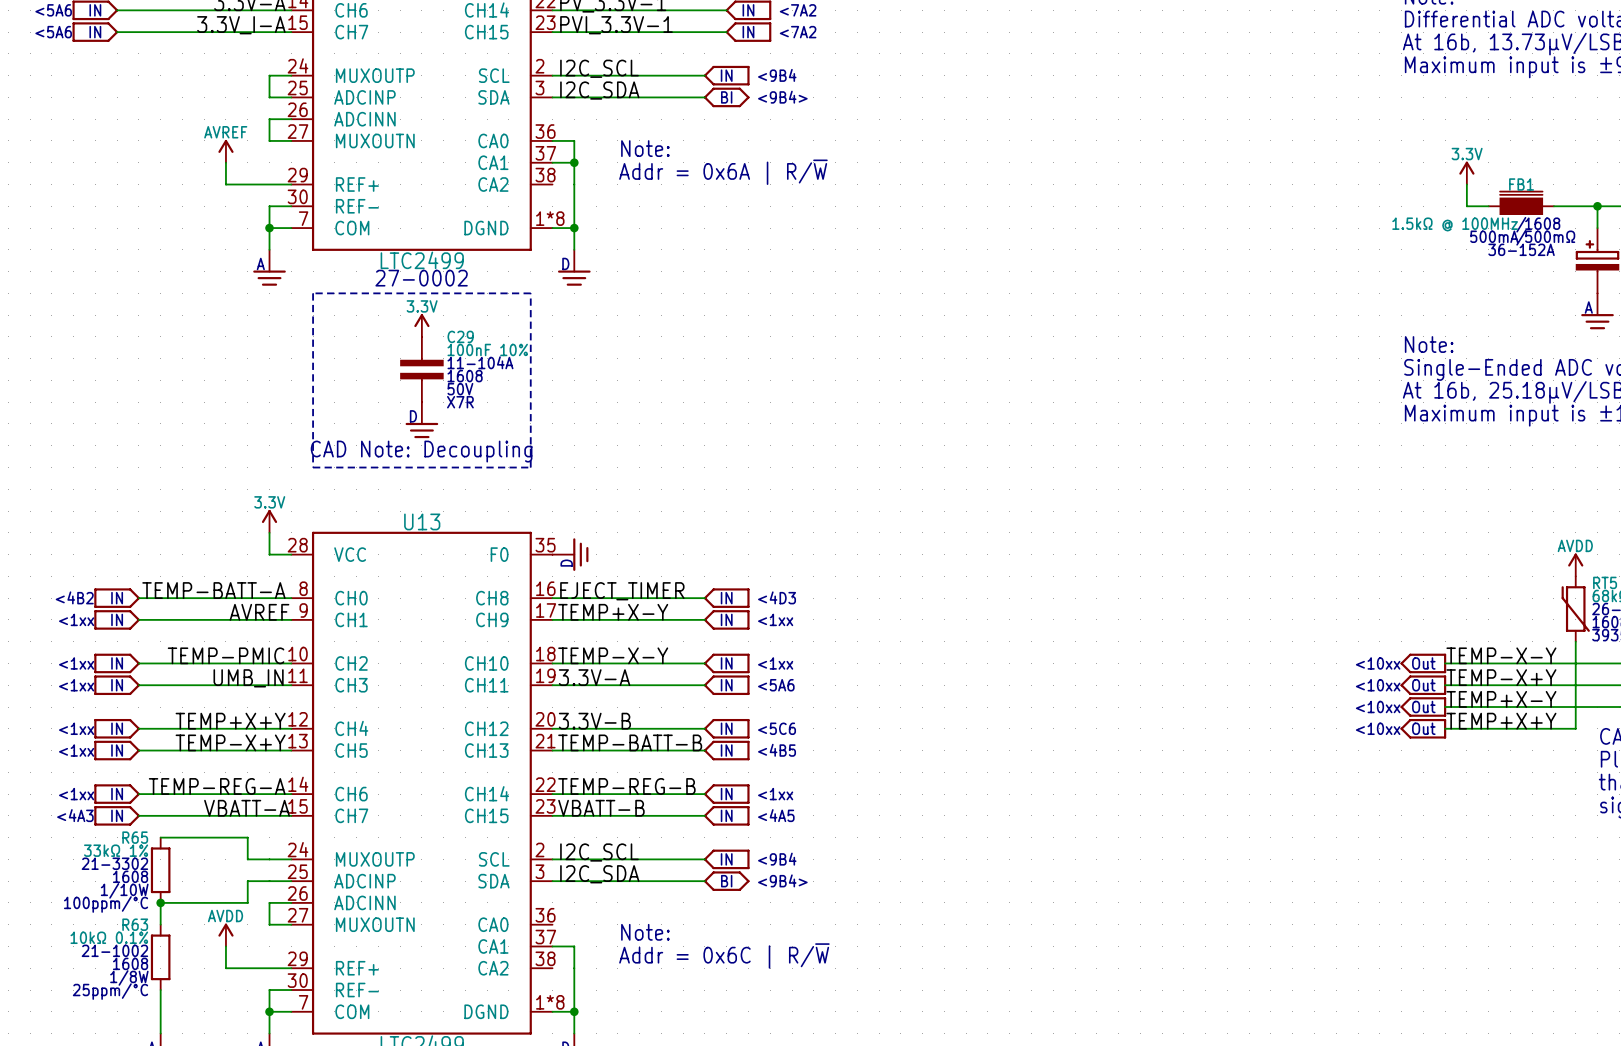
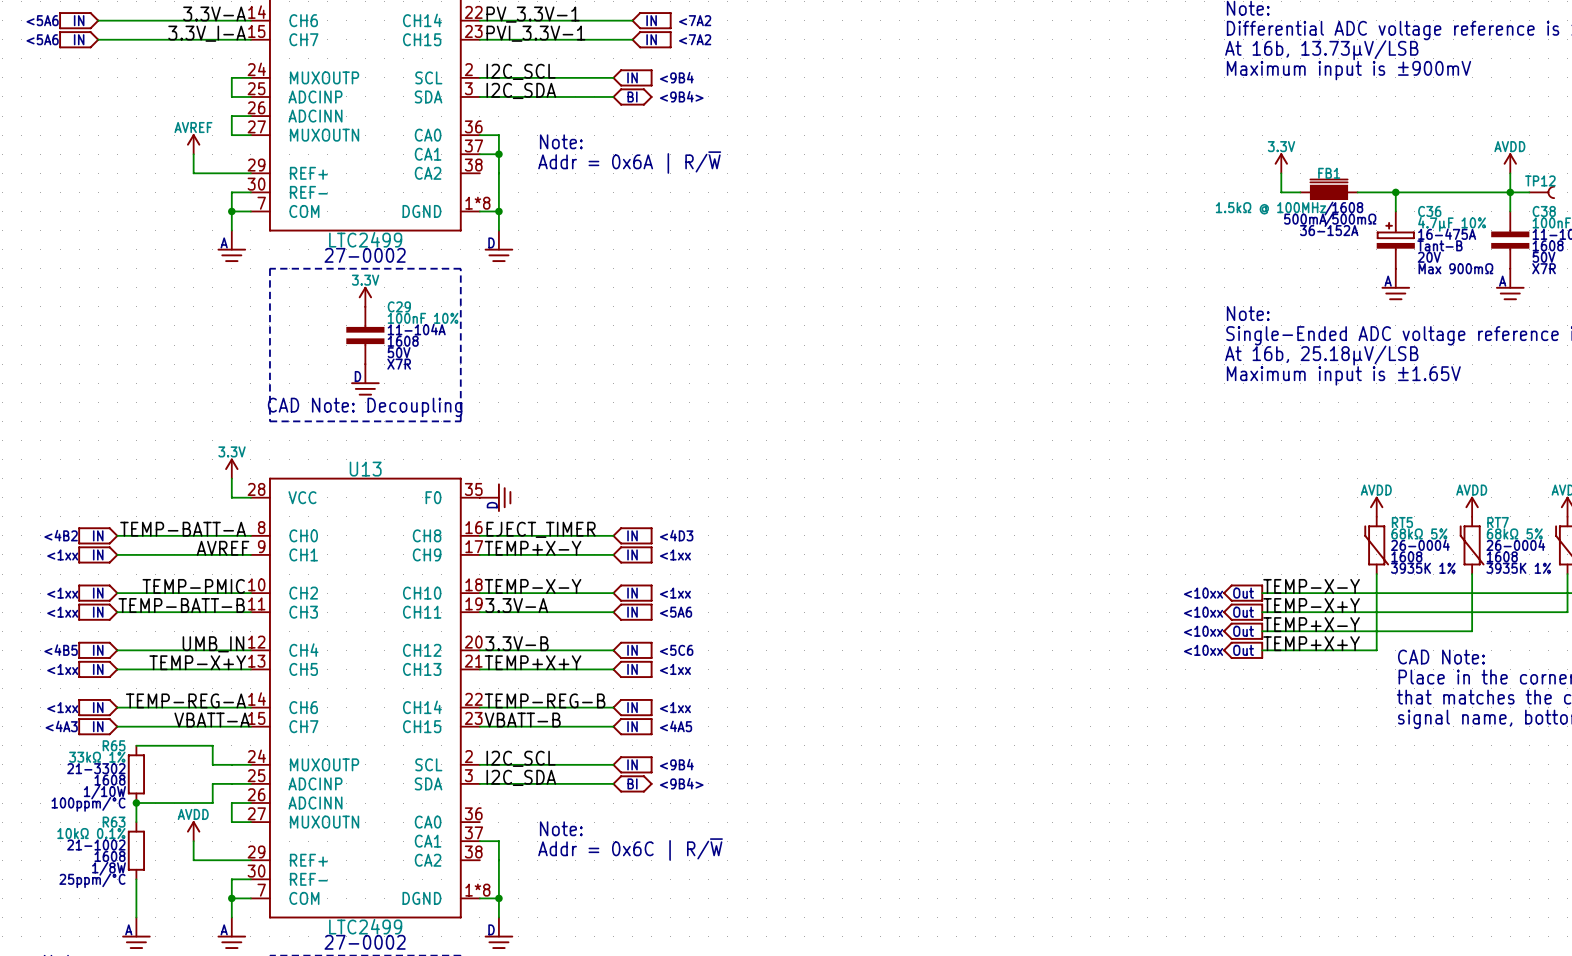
label: UMB_IN (248, 678) -> TEMP-BATT-B (181, 605)
label: TEMP+X+Y (230, 721) -> UMB_IN (213, 644)
text: <1xx (76, 728) -> <4B5 (61, 650)
label: TEMP-BATT-B (630, 742) -> TEMP+X+Y (533, 662)
text: <4B5 (777, 750) -> <1xx (675, 669)

